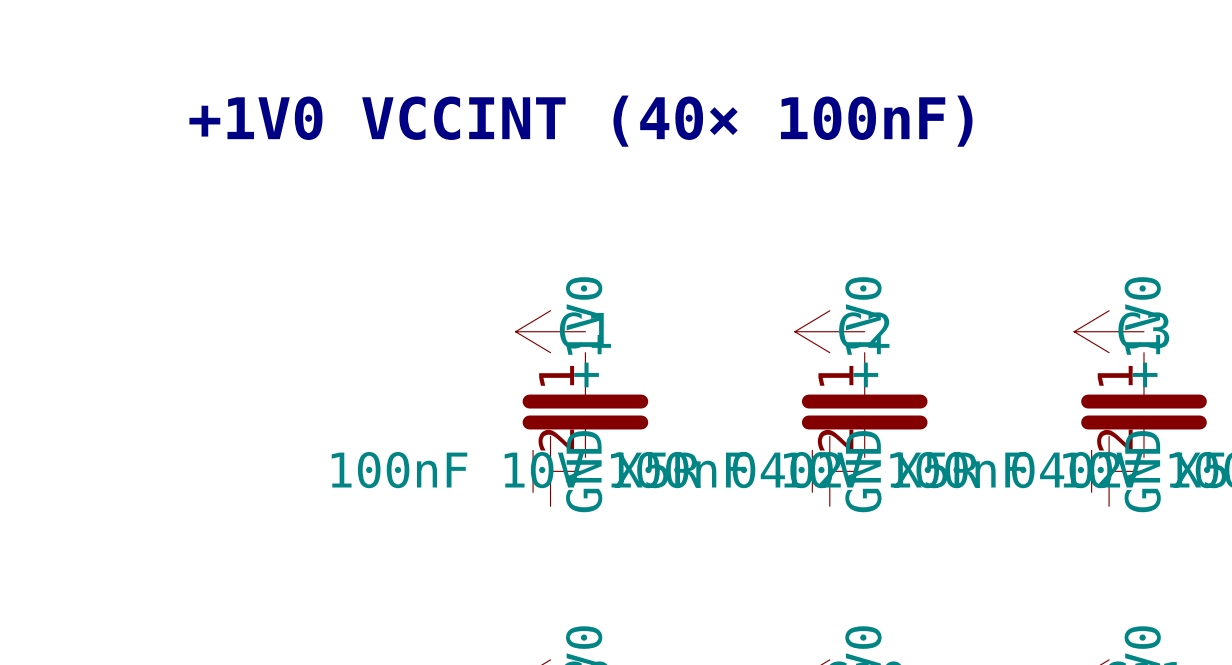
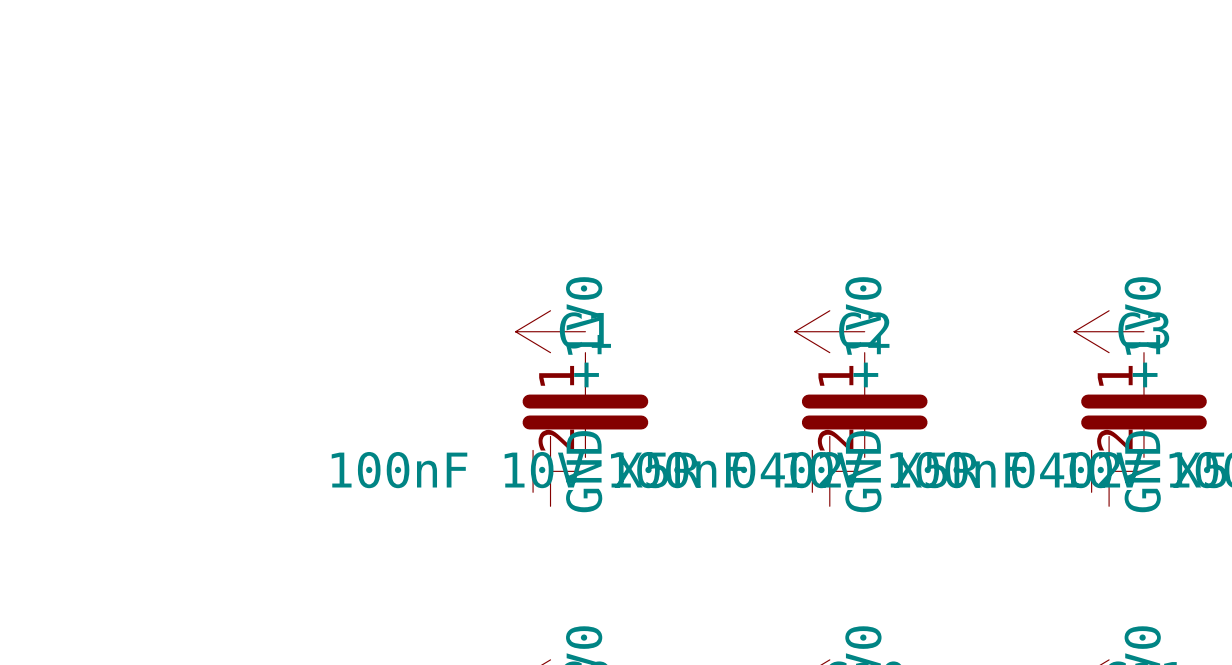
text: +1V0 VCCINT (40× 100nF) (580, 121) -> none

